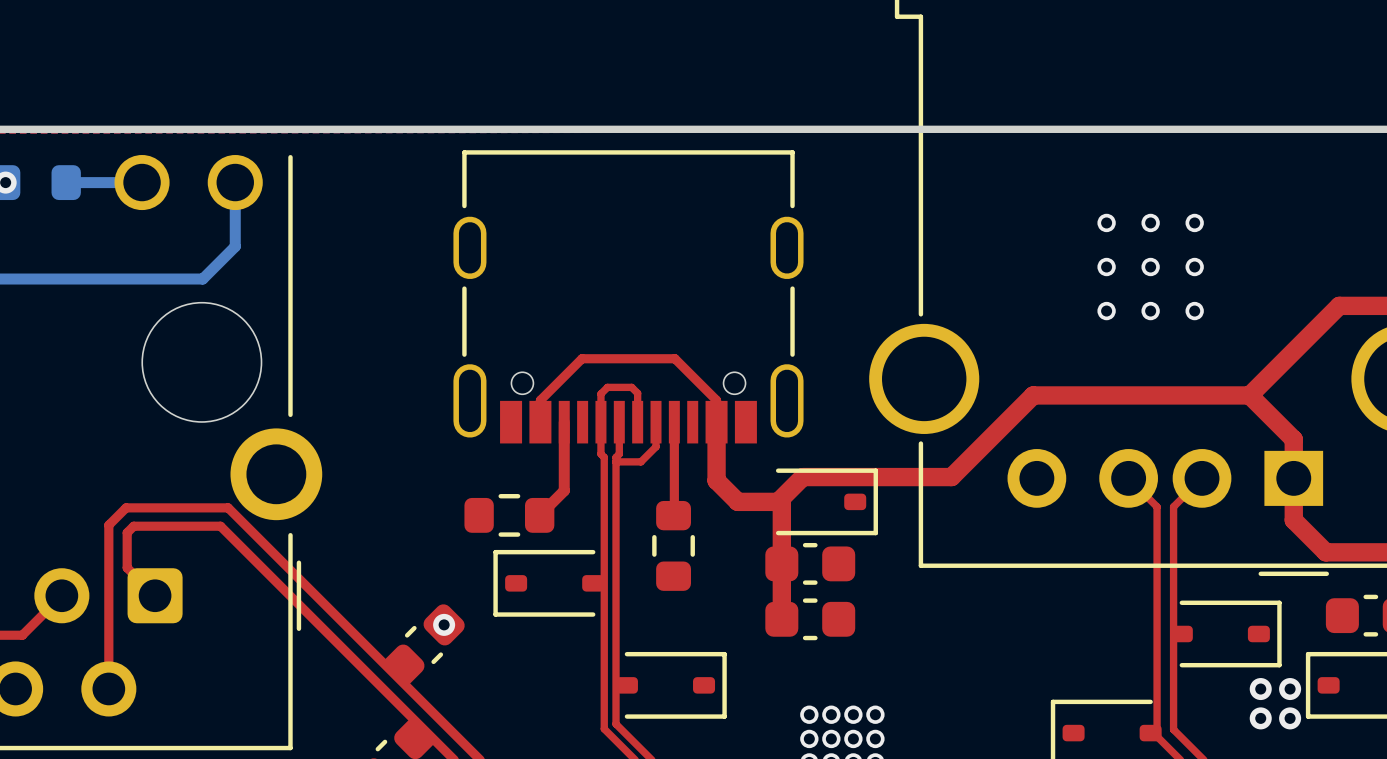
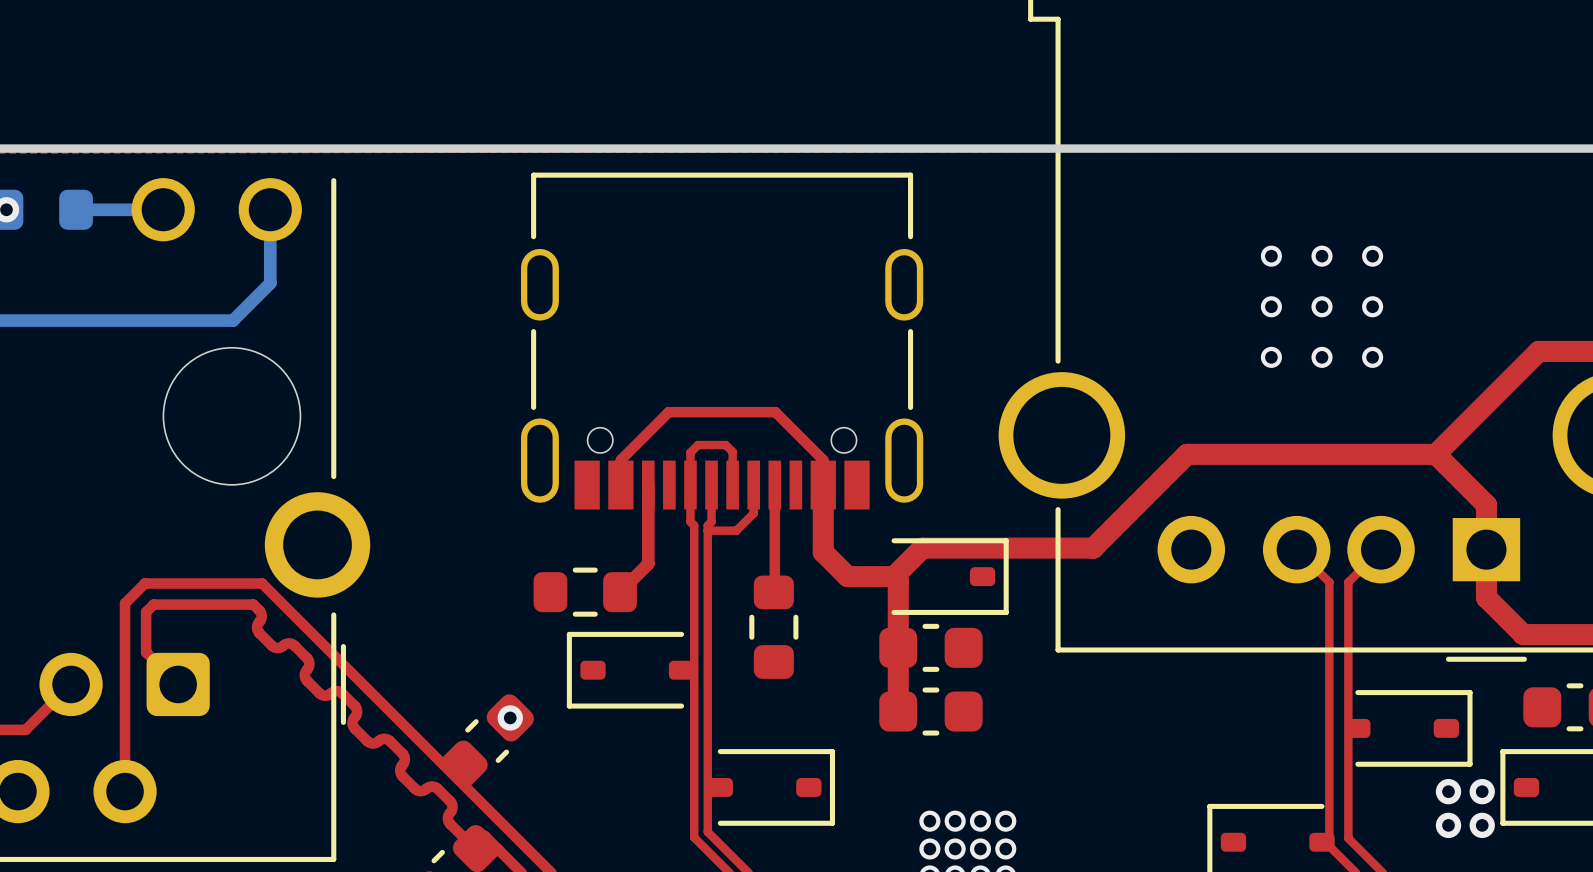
top track: (225, 531) (256, 562) -> (259, 610) (261, 617) (257, 624) (257, 630) (272, 645) (278, 647) (288, 643) (294, 645)
top track: (267, 572) (297, 603) -> (307, 658) (309, 664) (304, 675) (307, 680) (322, 695) (327, 695) (335, 691) (342, 693)
top track: (308, 614) (339, 645) -> (354, 706) (357, 712) (352, 720) (353, 725) (367, 741) (374, 743) (384, 738) (389, 741)
top track: (350, 656) (380, 686) -> (402, 753) (404, 760) (400, 768) (400, 773) (415, 788) (420, 791) (430, 786) (437, 788)
top track: (391, 697) (422, 728) -> (450, 801) (452, 808) (448, 816) (448, 821) (462, 836) (468, 838) (478, 834) (485, 836)

